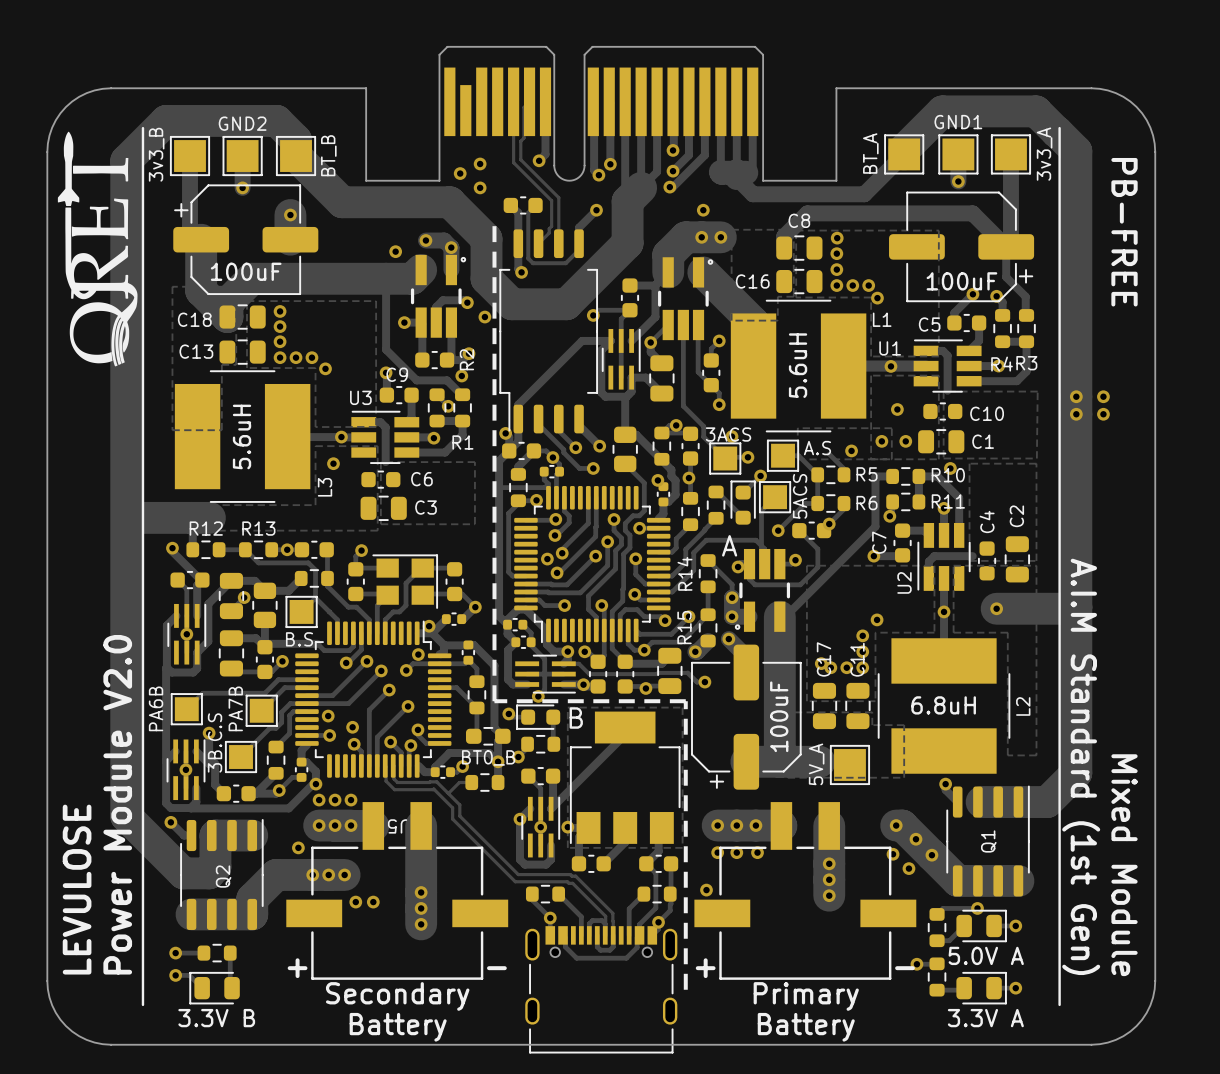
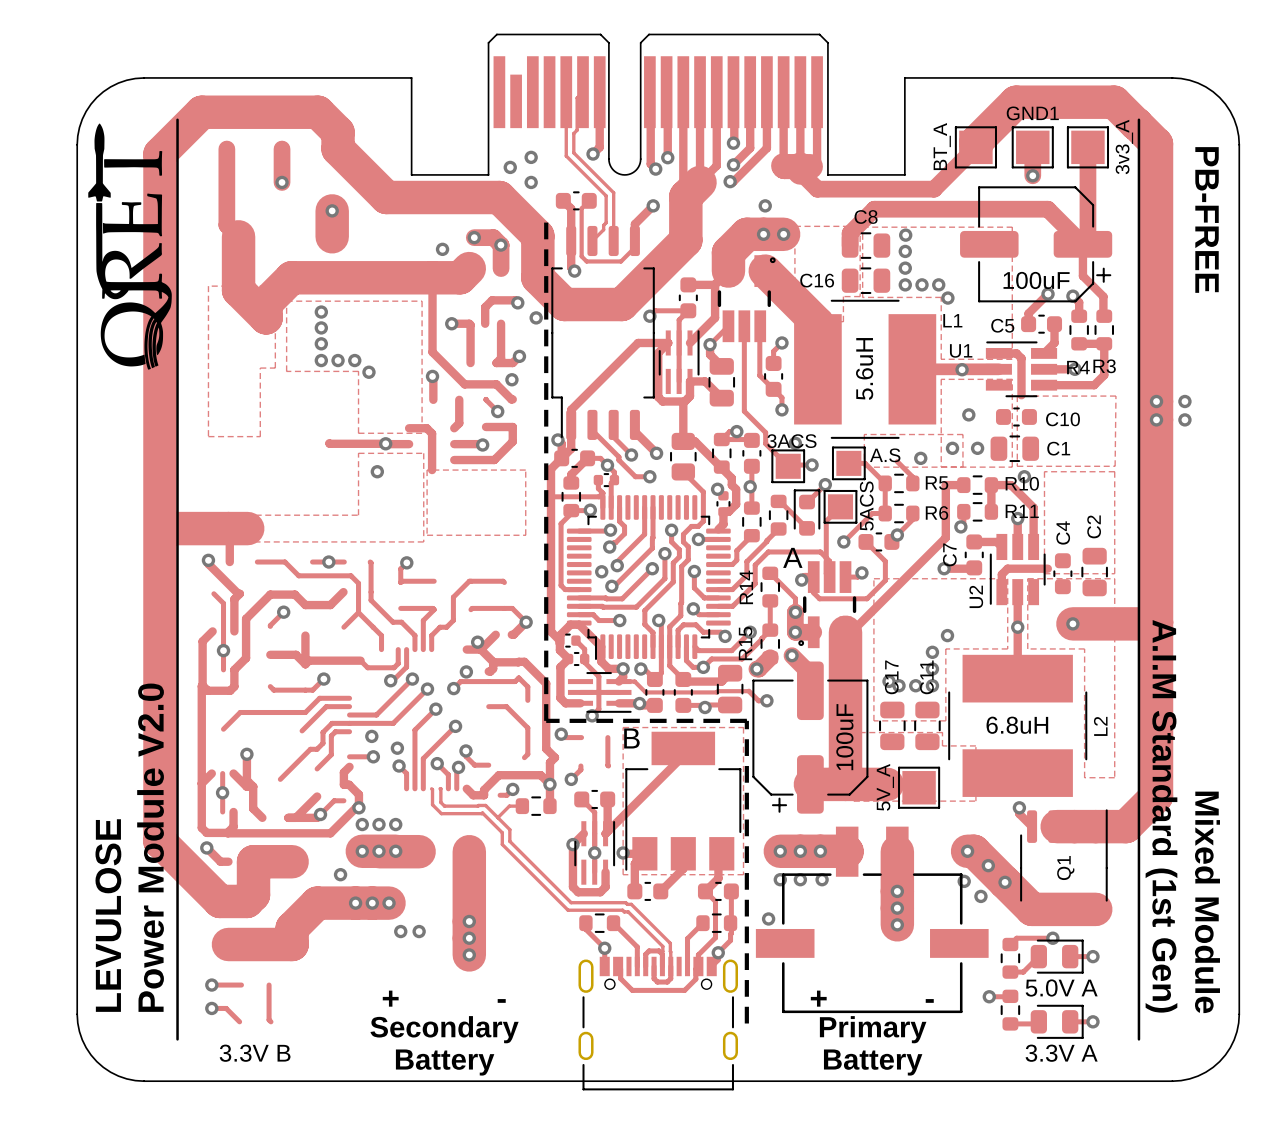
part: 3v3_B (190, 156) -> none
part: GND2 (242, 156) -> none
part: BT_B (296, 156) -> none
part: 100uF (245, 239) -> none
part: (438, 296) -> none
C18: (242, 317) -> none
C13: (242, 352) -> none
part: (434, 360) -> none
C9: (399, 395) -> none
R2: (437, 407) -> none
R1: (462, 407) -> none
L3: 5.6uH (242, 436) -> none
U3: (385, 437) -> none
C6: (380, 479) -> none
C3: (383, 508) -> none
R12: (205, 549) -> none
R13: (258, 549) -> none
part: (314, 549) -> none
part: (314, 578) -> none
part: (190, 580) -> none
part: (355, 581) -> none
part: (405, 581) -> none
part: (454, 581) -> none
part: (231, 596) -> none
part: (264, 605) -> none
part: B.S (301, 611) -> none
part: (454, 619) -> none
part: (186, 634) -> none
part: (468, 652) -> none
part: (231, 653) -> none
part: (264, 659) -> none
part: (476, 694) -> none
part: (373, 699) -> none
part: PA6B (186, 709) -> none
part: PA7B (261, 710) -> none
part: (538, 717) -> none
part: BT0_B (488, 736) -> none
part: (540, 744) -> none
part: 3B.C.S (241, 757) -> none
part: (276, 760) -> none
part: (186, 769) -> none
part: (301, 769) -> none
part: (442, 772) -> none
part: (236, 793) -> none
Q2: (221, 874) -> none
J5: (397, 890) -> none
part: (217, 953) -> none
part: (214, 988) -> none

